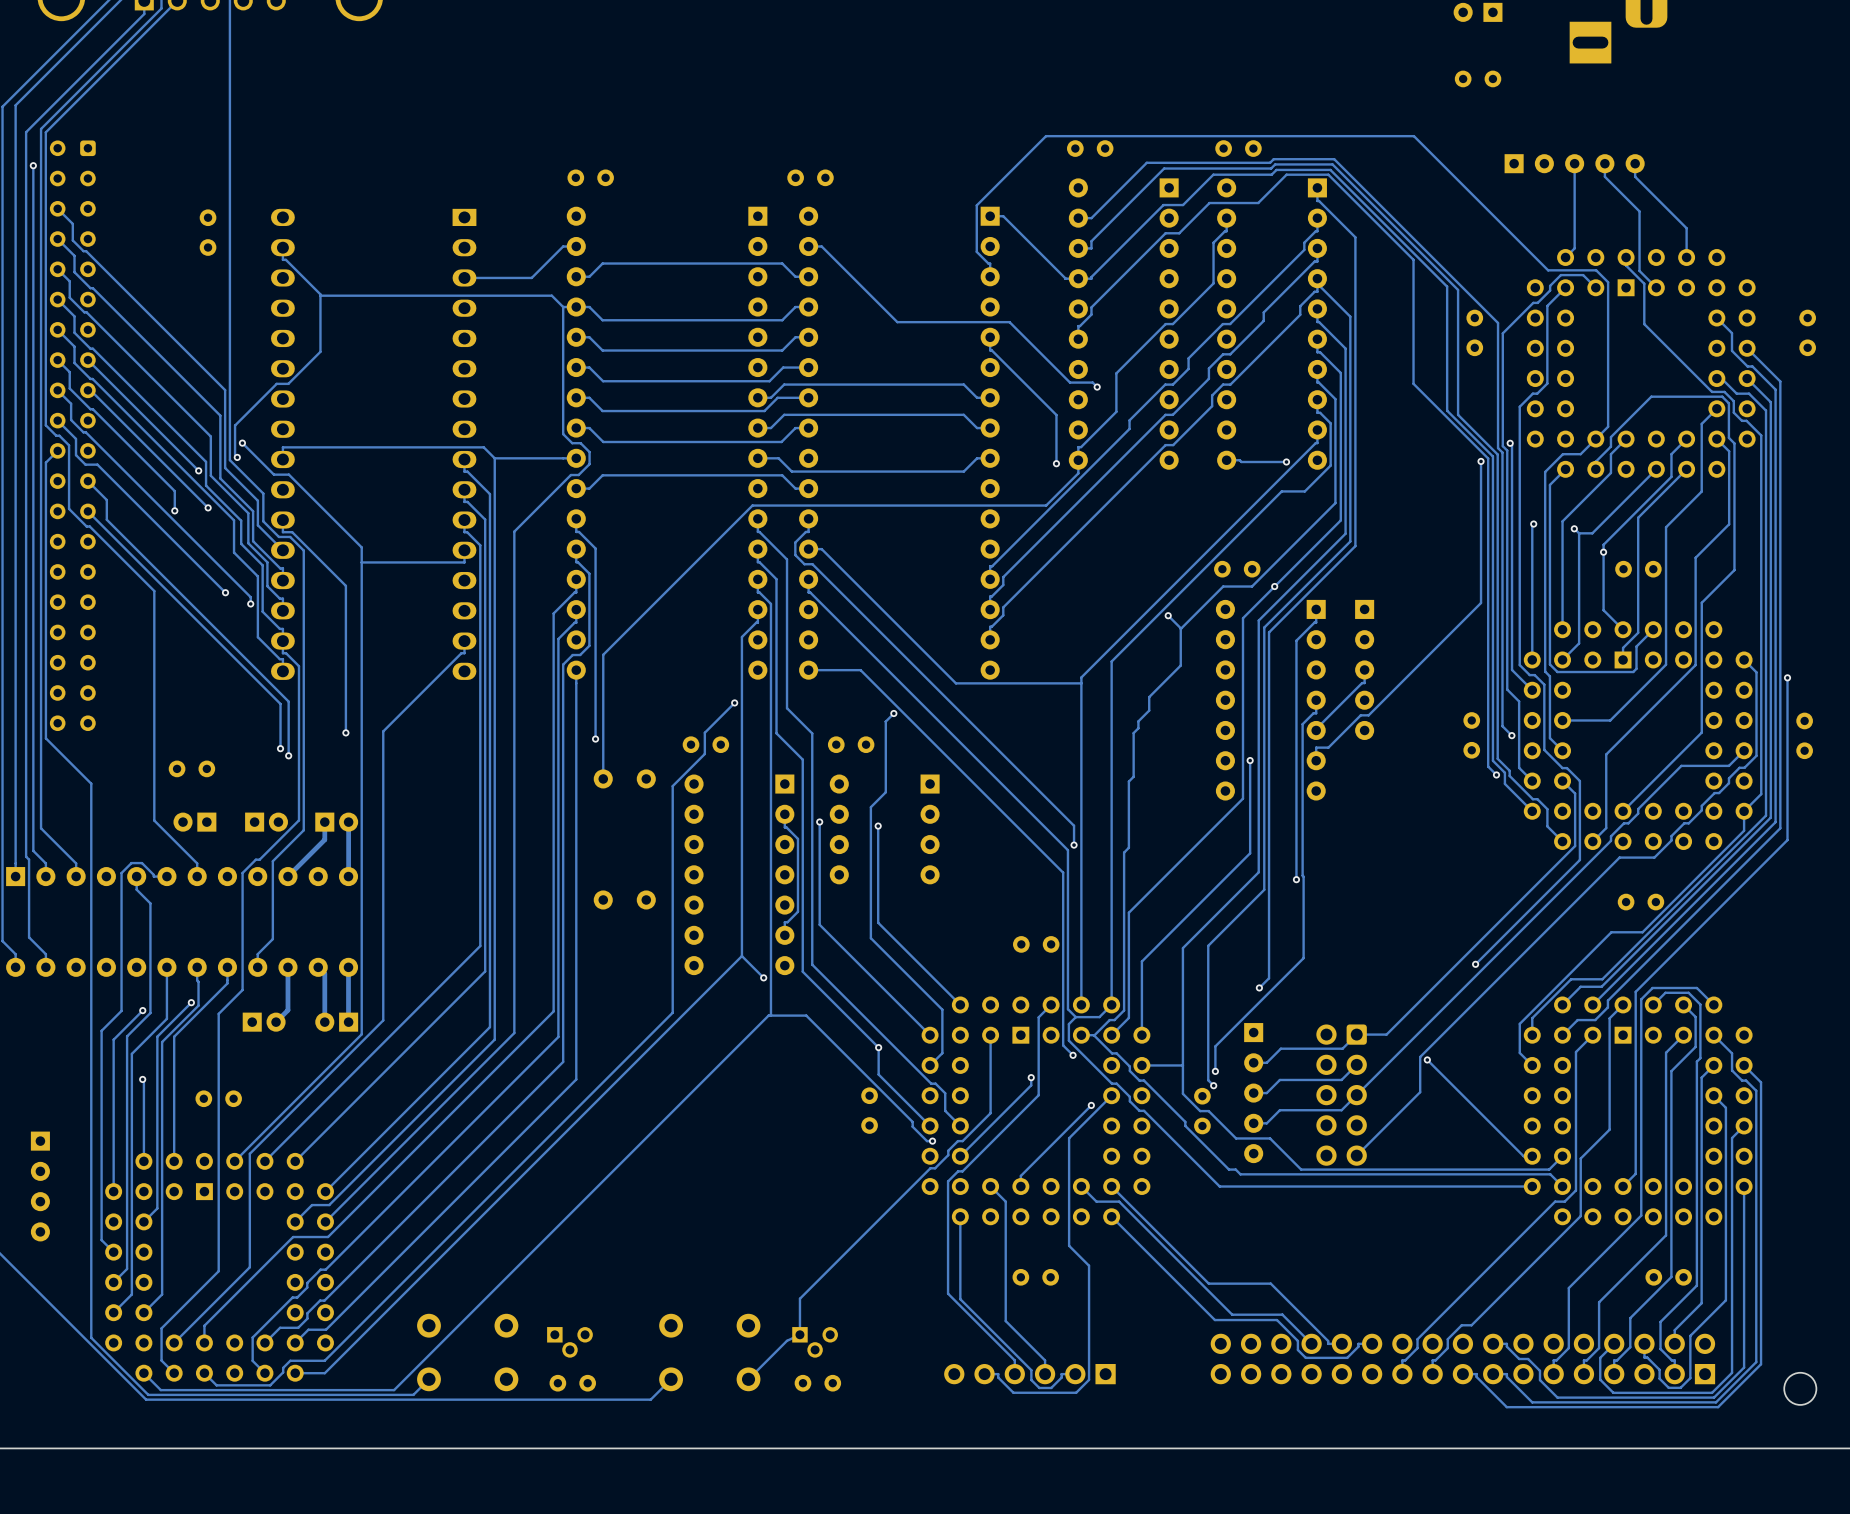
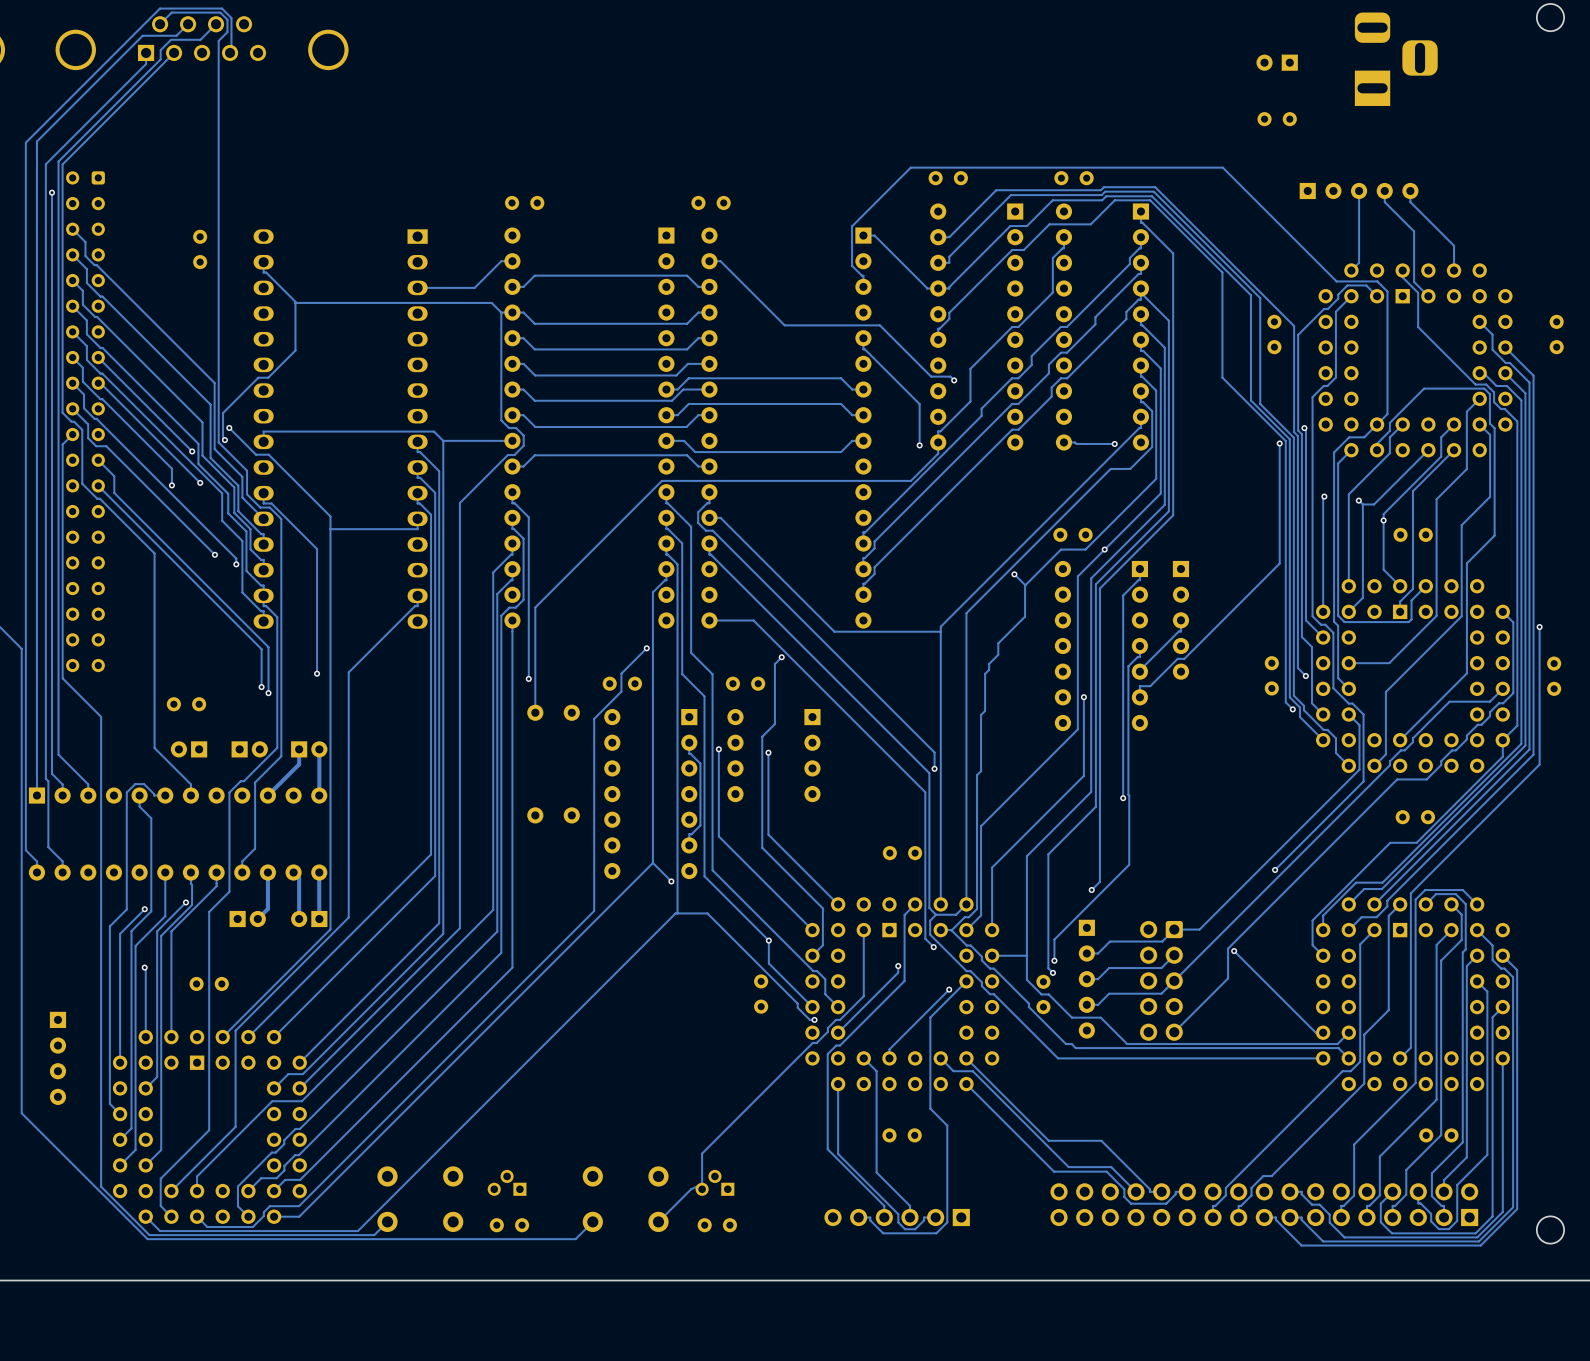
part rotation: 0° (569, 1342) -> 180° (507, 1182)
part rotation: 0° (815, 1342) -> 180° (714, 1182)

